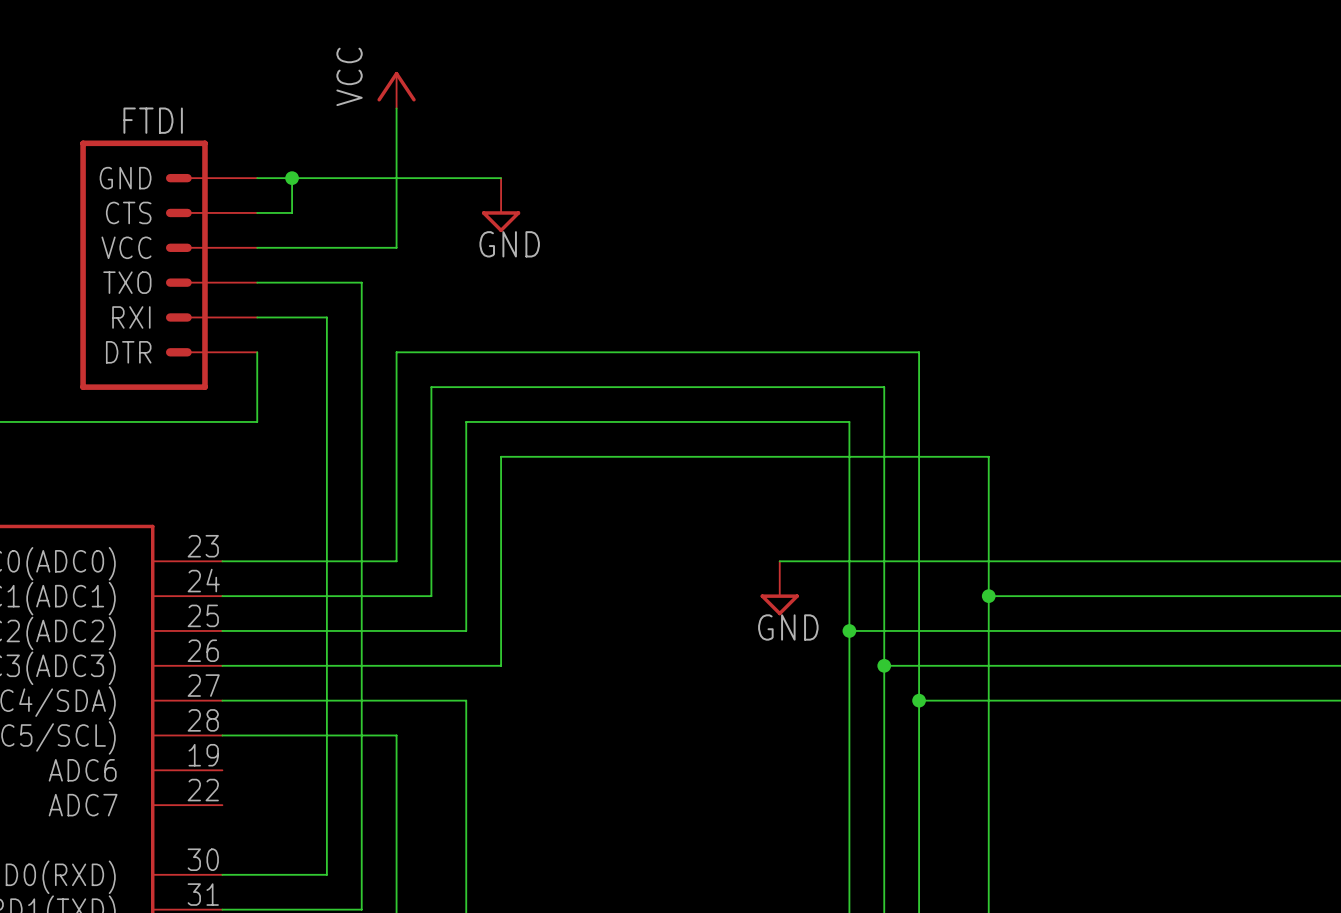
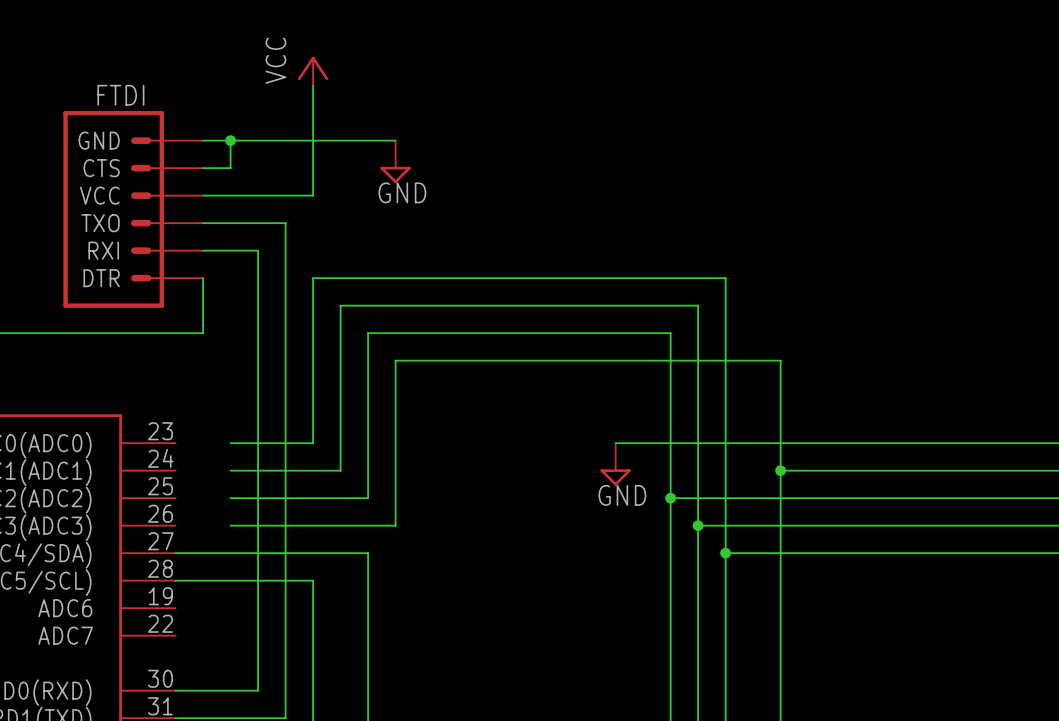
wire: (222, 561) (292, 561) -> none
wire: (222, 596) (292, 596) -> none
wire: (222, 630) (292, 630) -> none
wire: (222, 665) (292, 665) -> none

